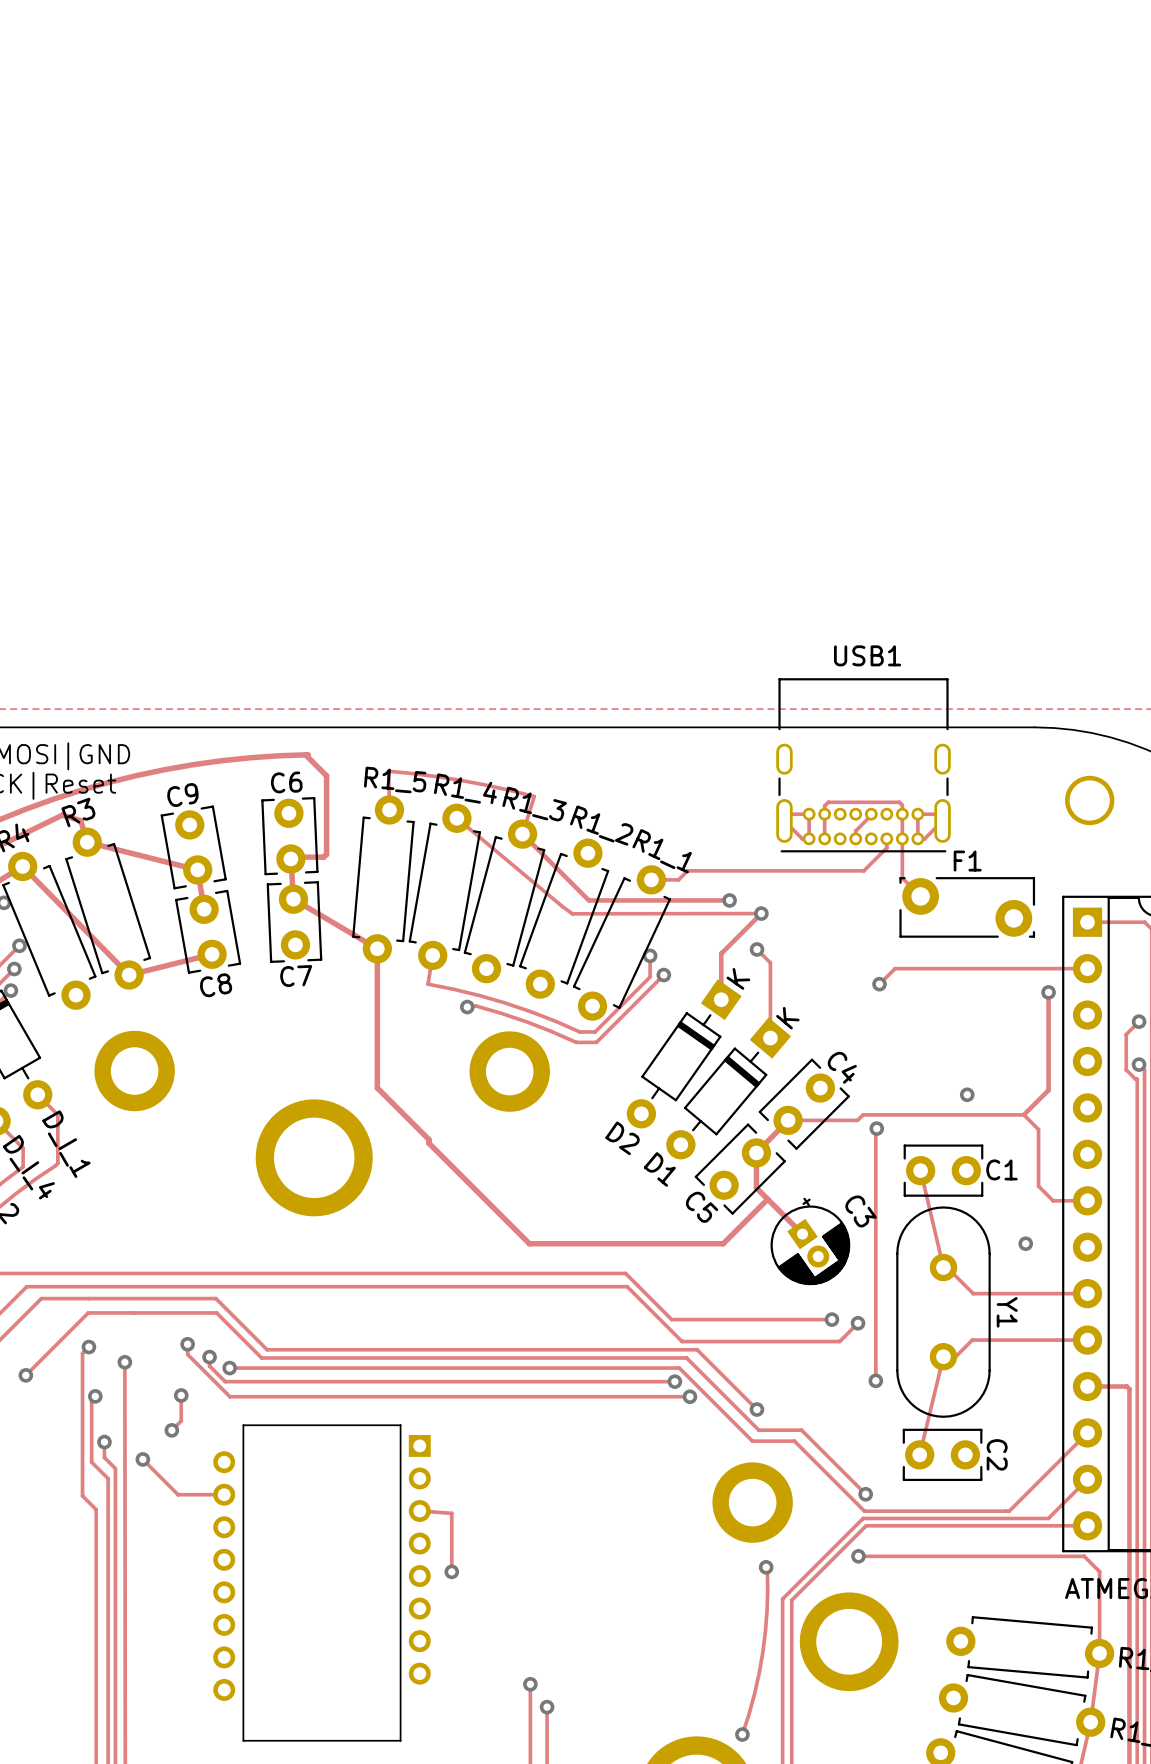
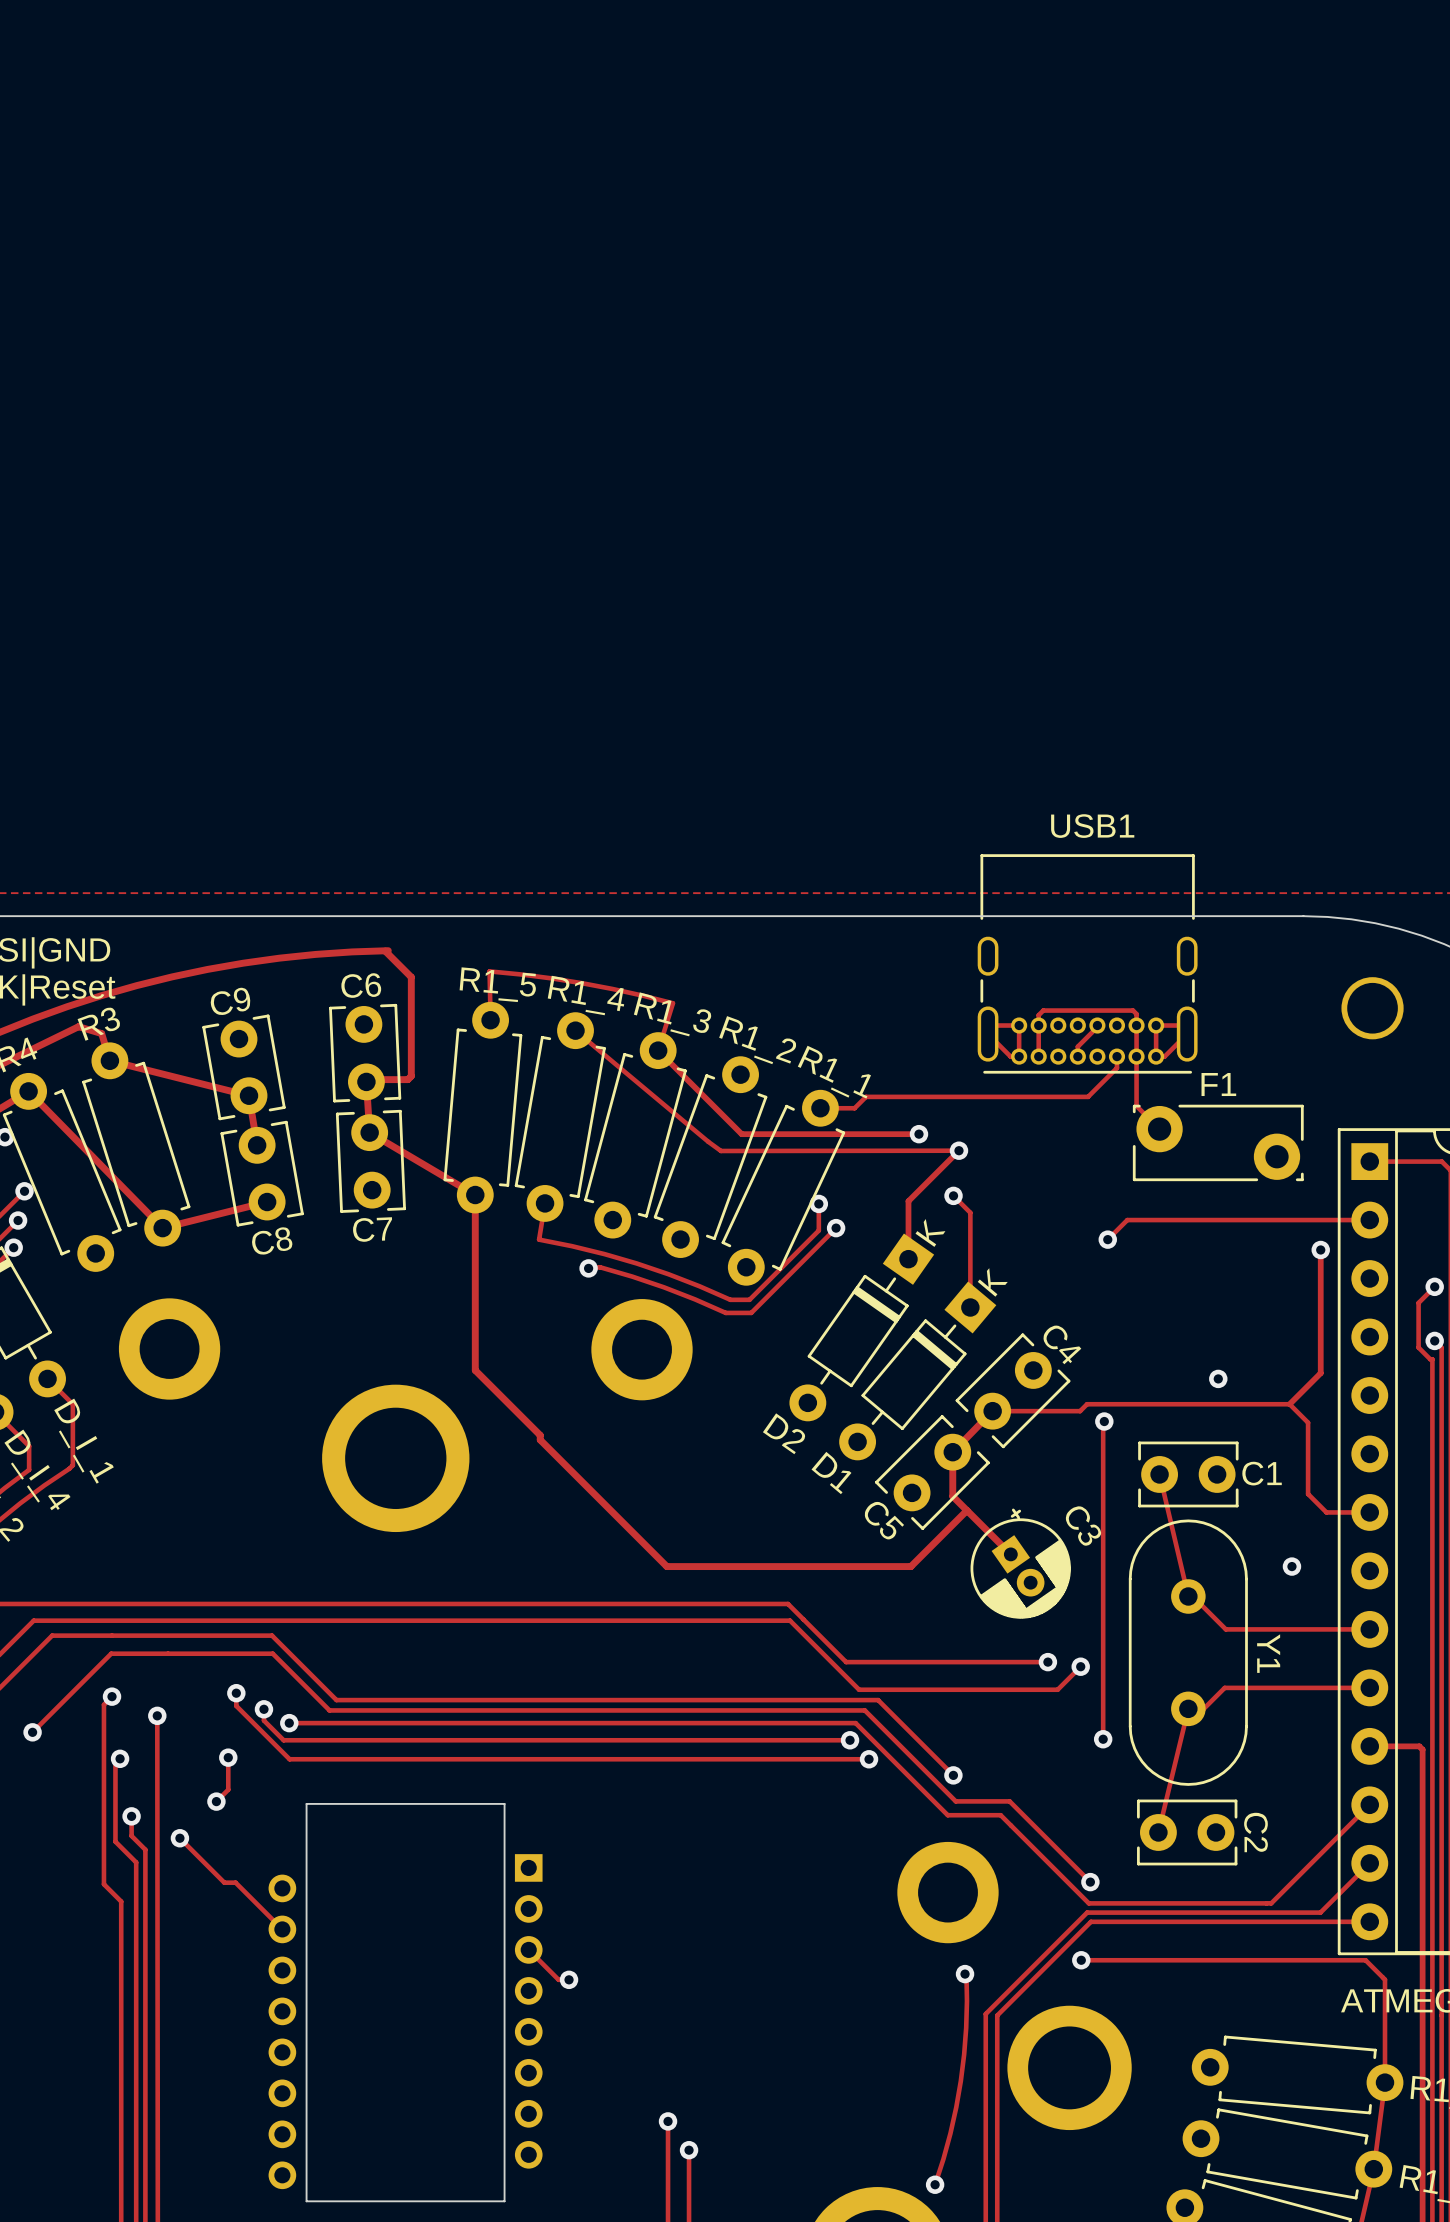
part footprint: [213, 1424, 431, 1742] -> [268, 1803, 543, 2202]
track: (187, 1494) (224, 1494) -> (235, 1882) (282, 1929)
track: (419, 1510) (451, 1513) (451, 1571) -> (528, 1949) (558, 1979) (569, 1979)

